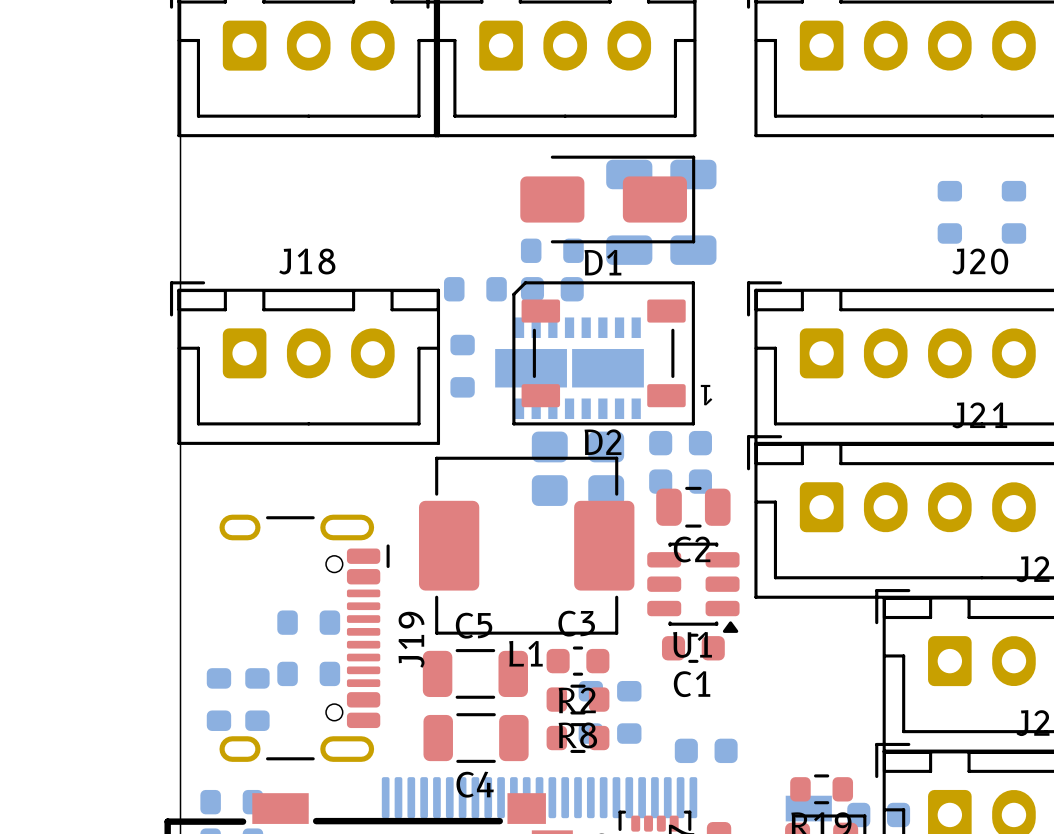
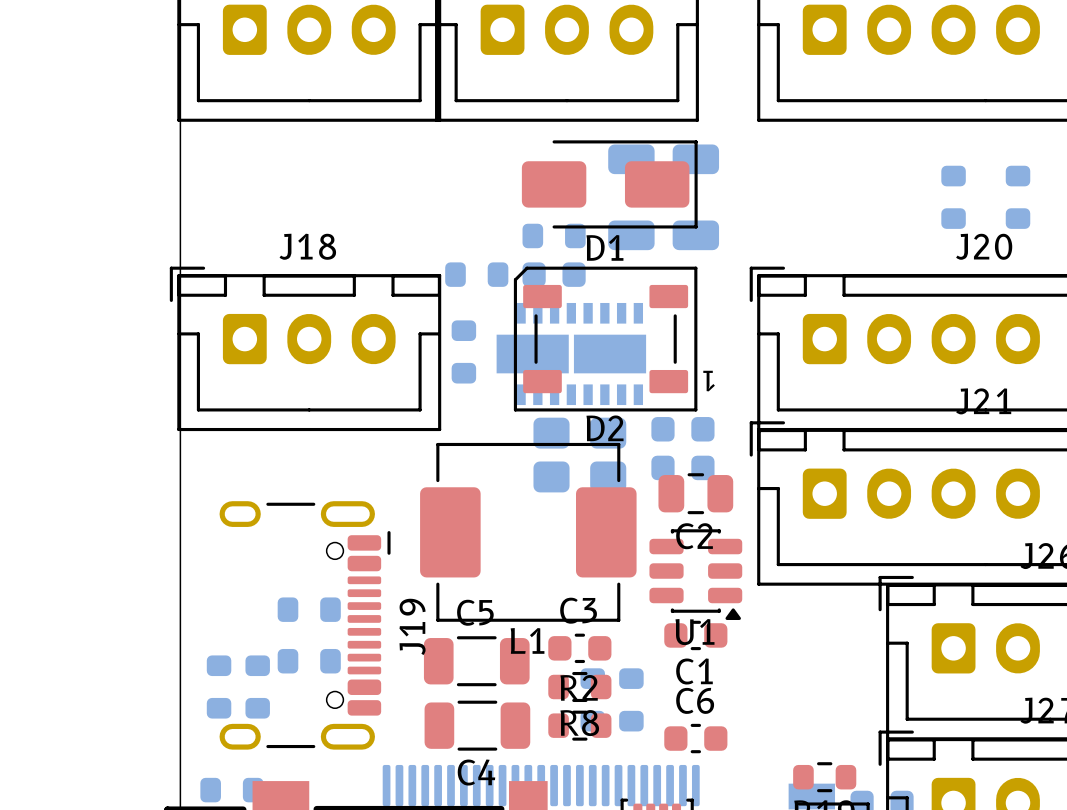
C6 side: bottom (706, 750) -> top (695, 738)

